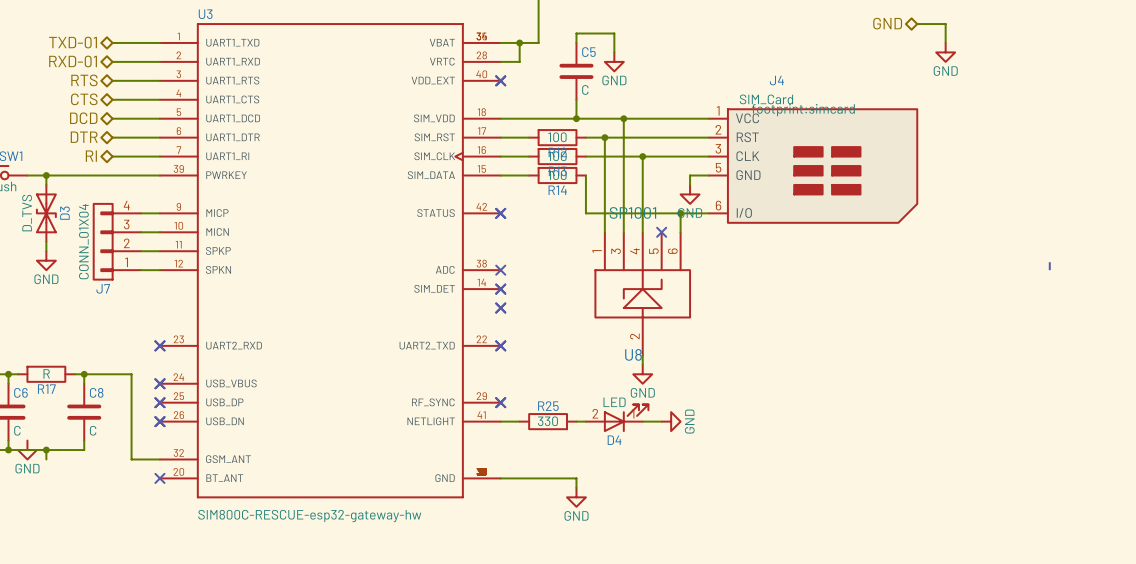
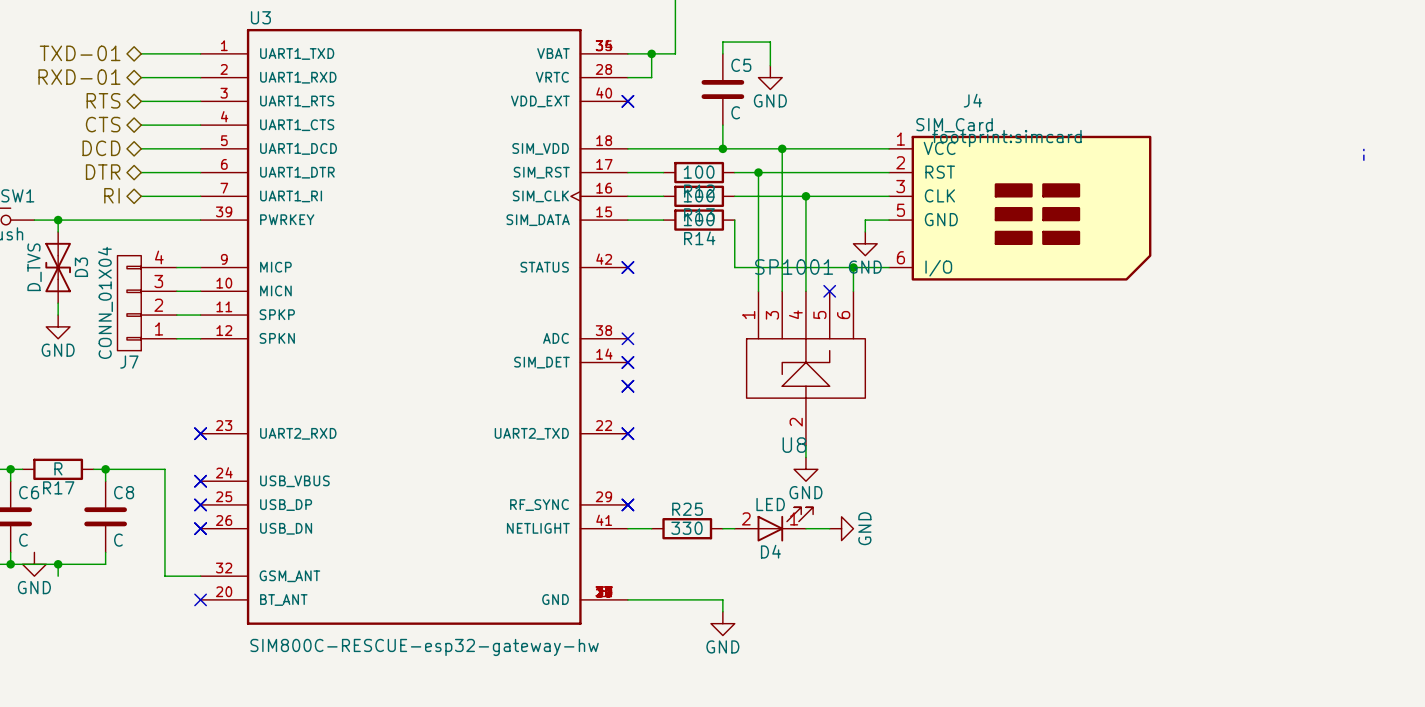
hierarchical label: GND (887, 23) -> none
wire: (917, 24) (945, 24) (945, 42) -> none
power symbol: GND (945, 52) -> none
line: (1049, 260) (1049, 270) -> (1363, 148) (1363, 160)

